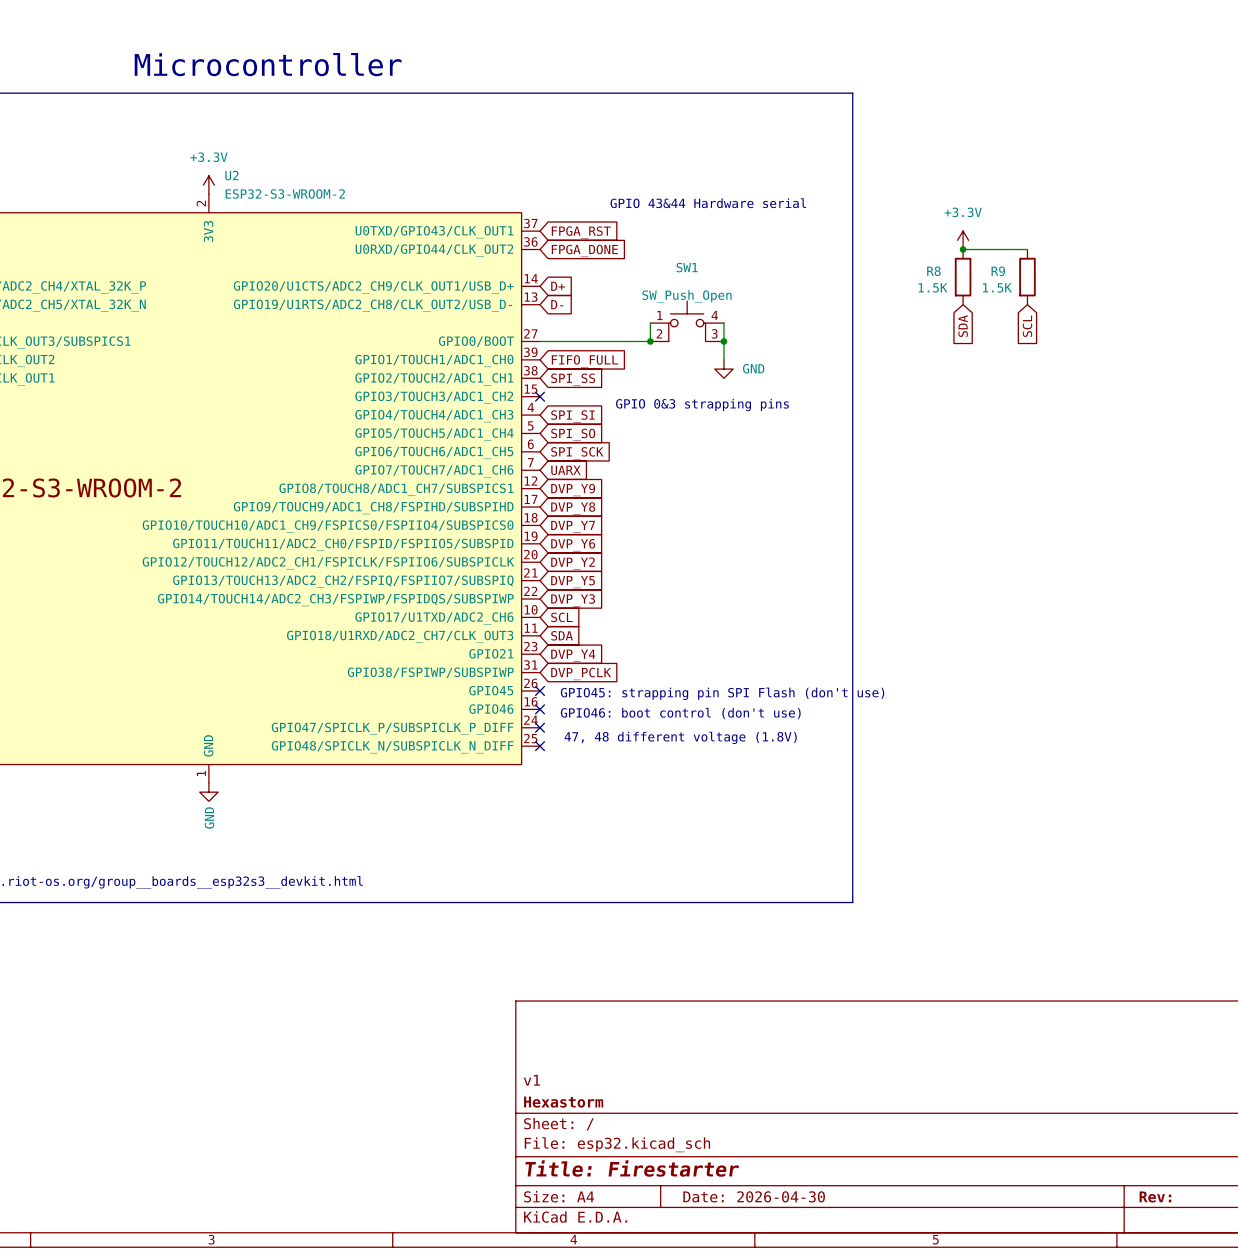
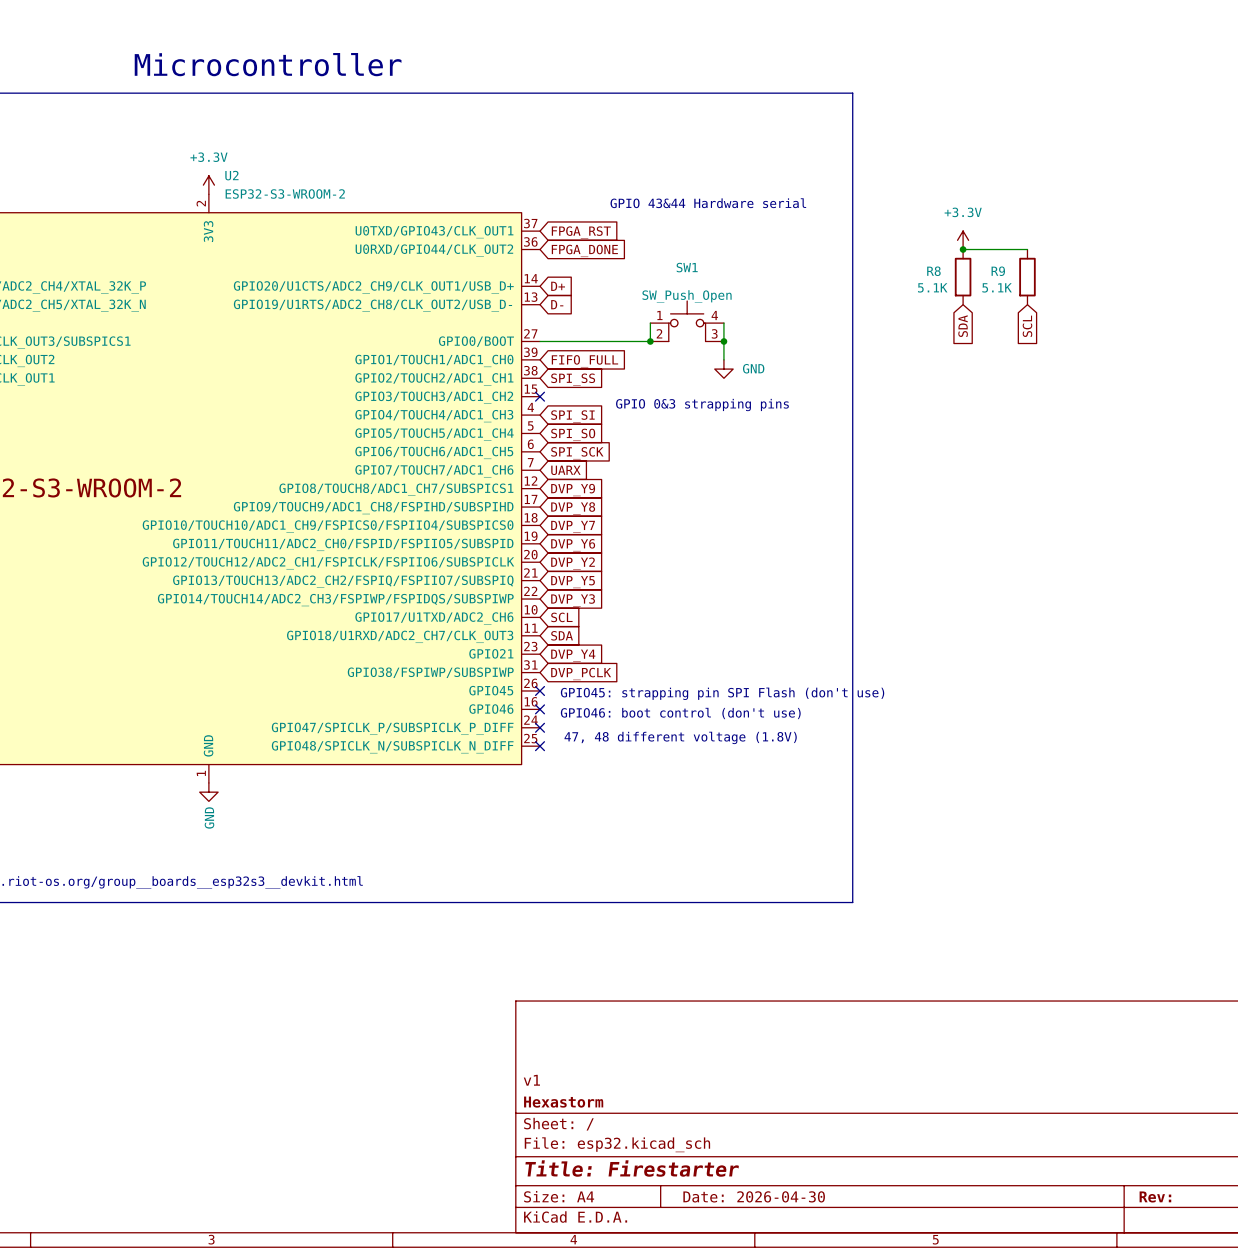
R8 value: 1.5K (933, 287) -> 5.1K (932, 287)
R9 value: 1.5K (997, 287) -> 5.1K (997, 287)

